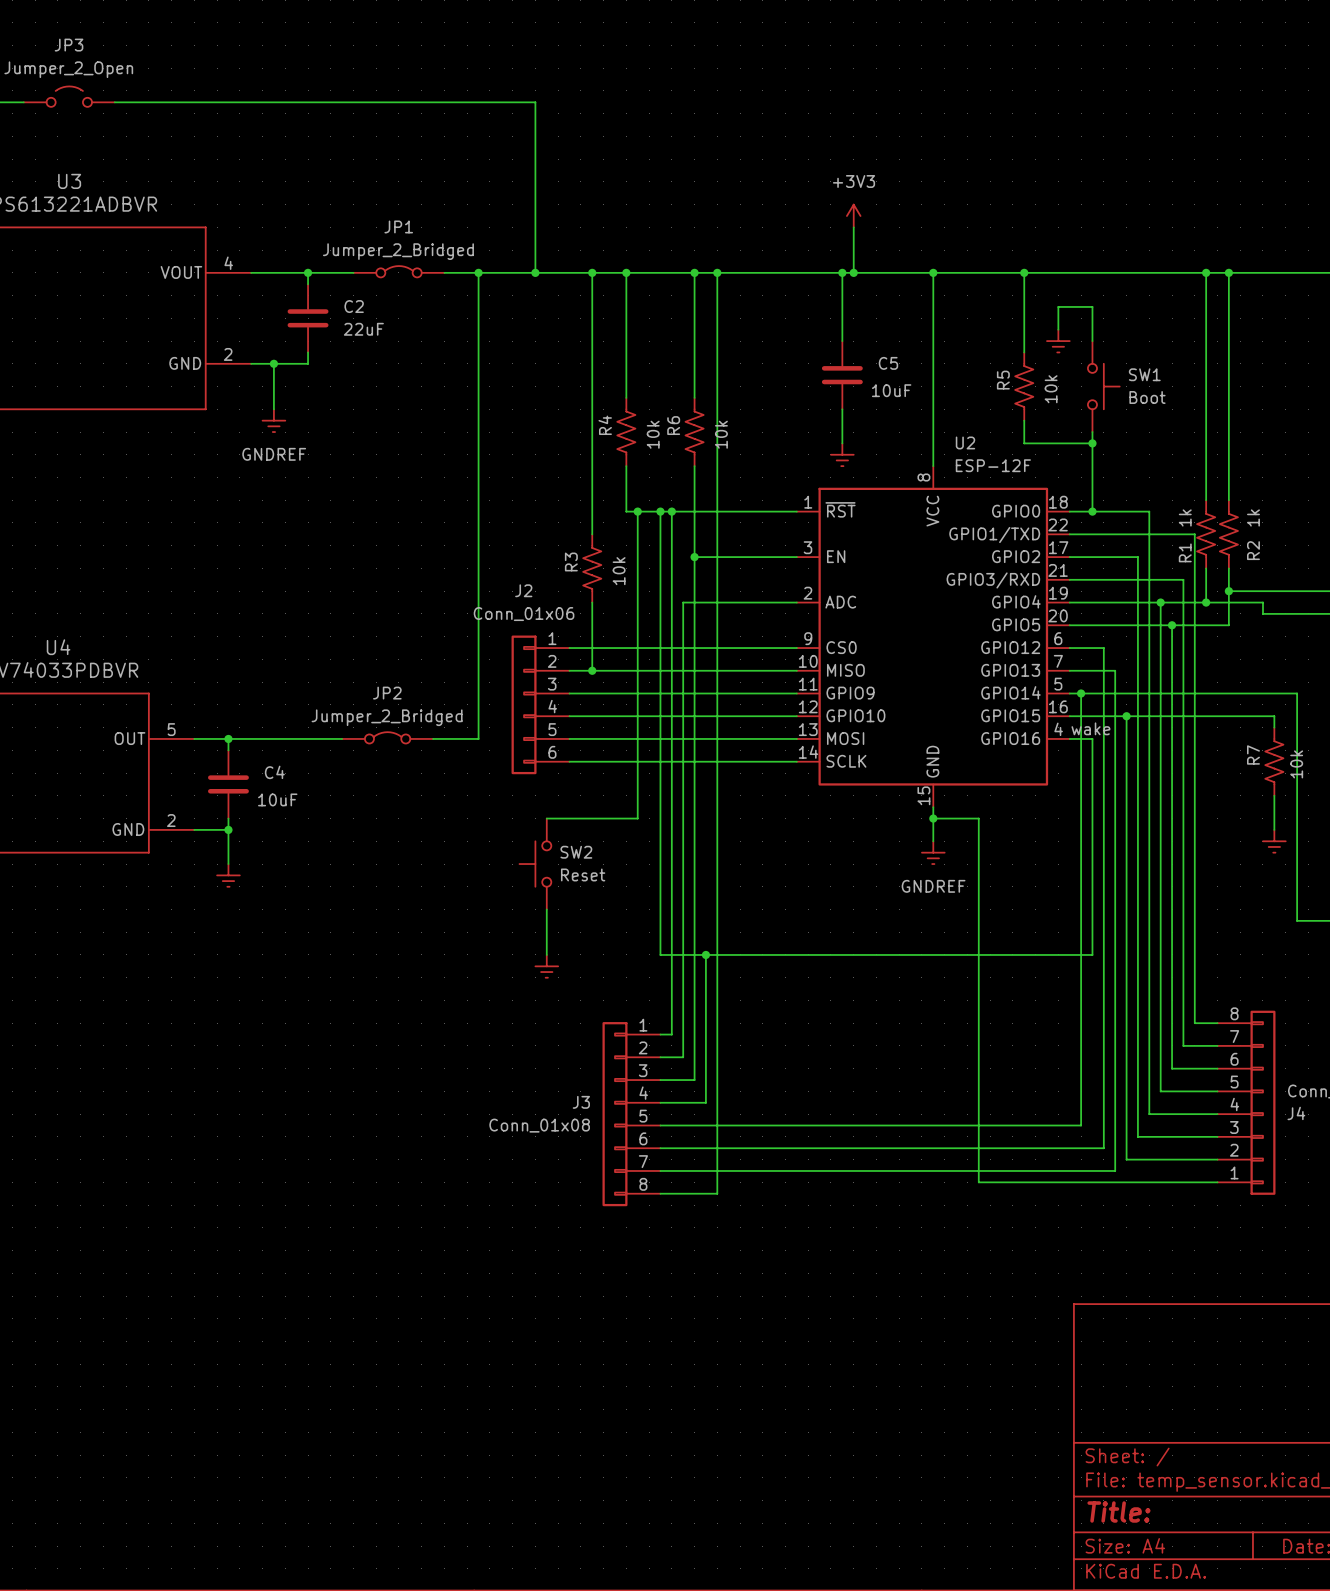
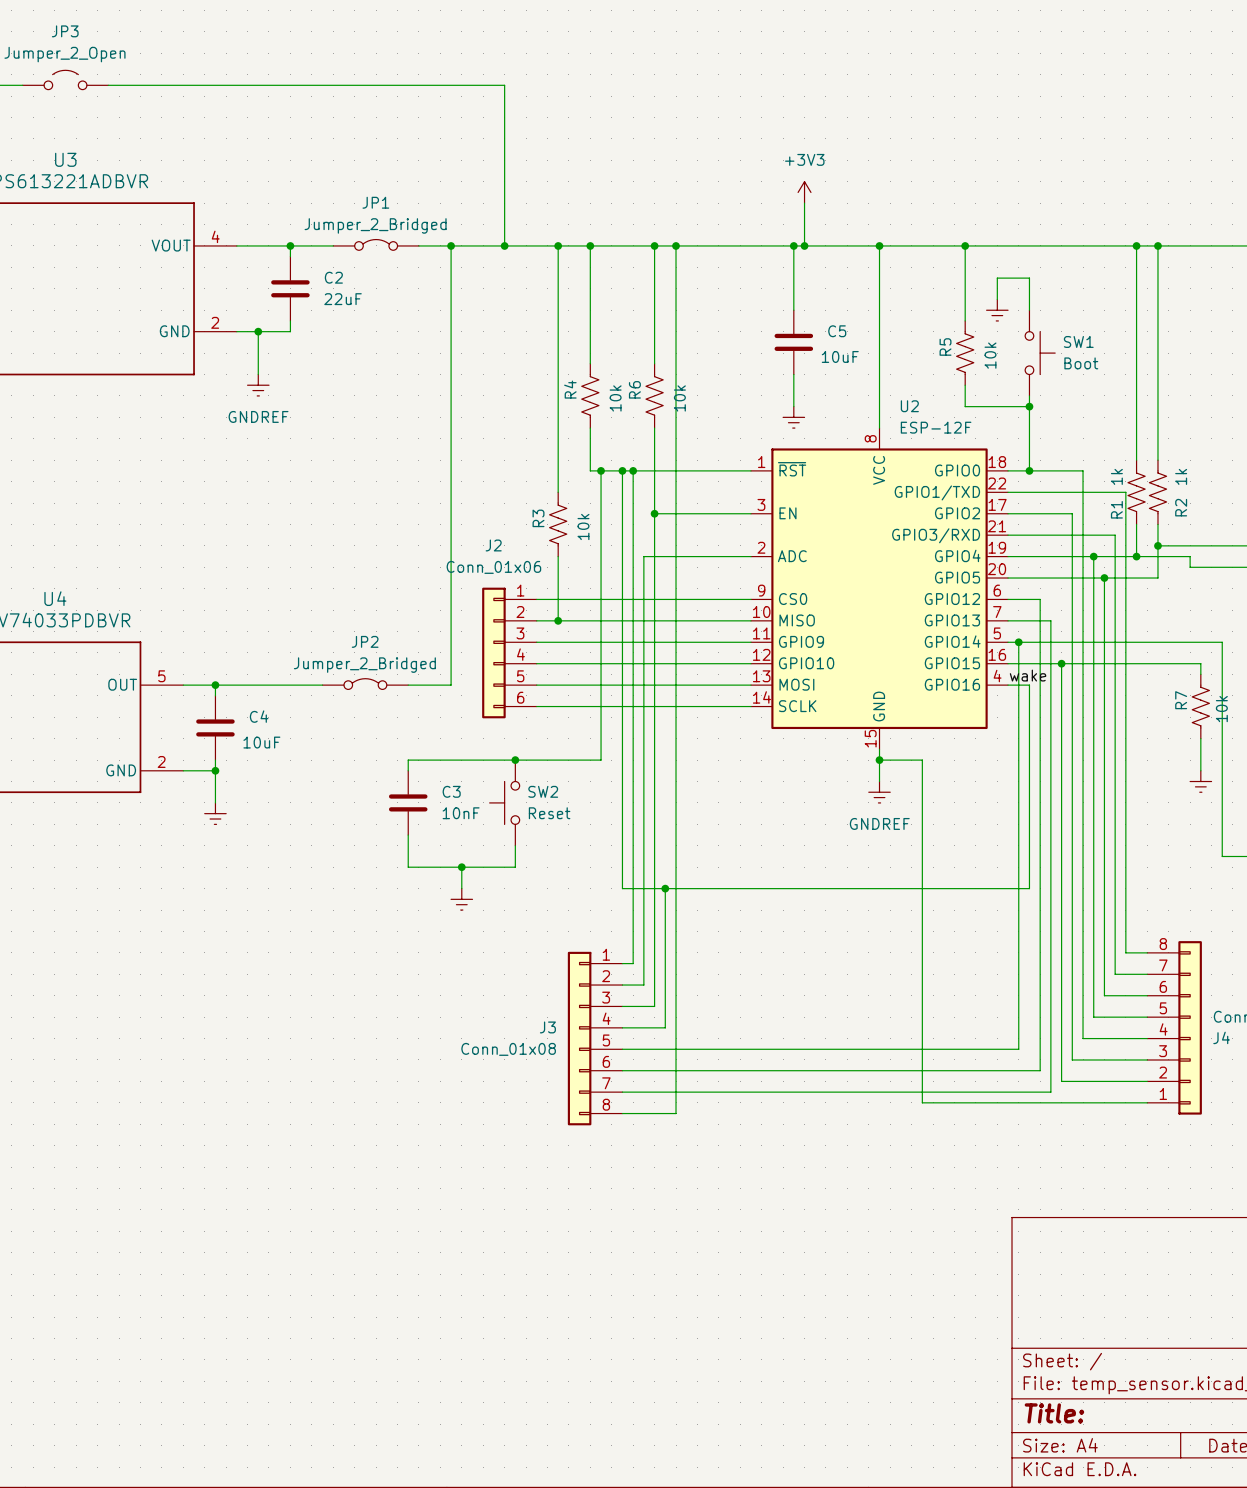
wire: none -> (515, 760) (408, 760) (408, 770)
junction: none -> (515, 760)
C3: none -> 10nF (408, 802)
wire: none -> (461, 867) (461, 888)
junction: none -> (461, 867)
wire: (546, 932) (546, 954) -> (515, 867) (408, 867) (408, 835)
power symbol position: (546, 966) -> (461, 899)

